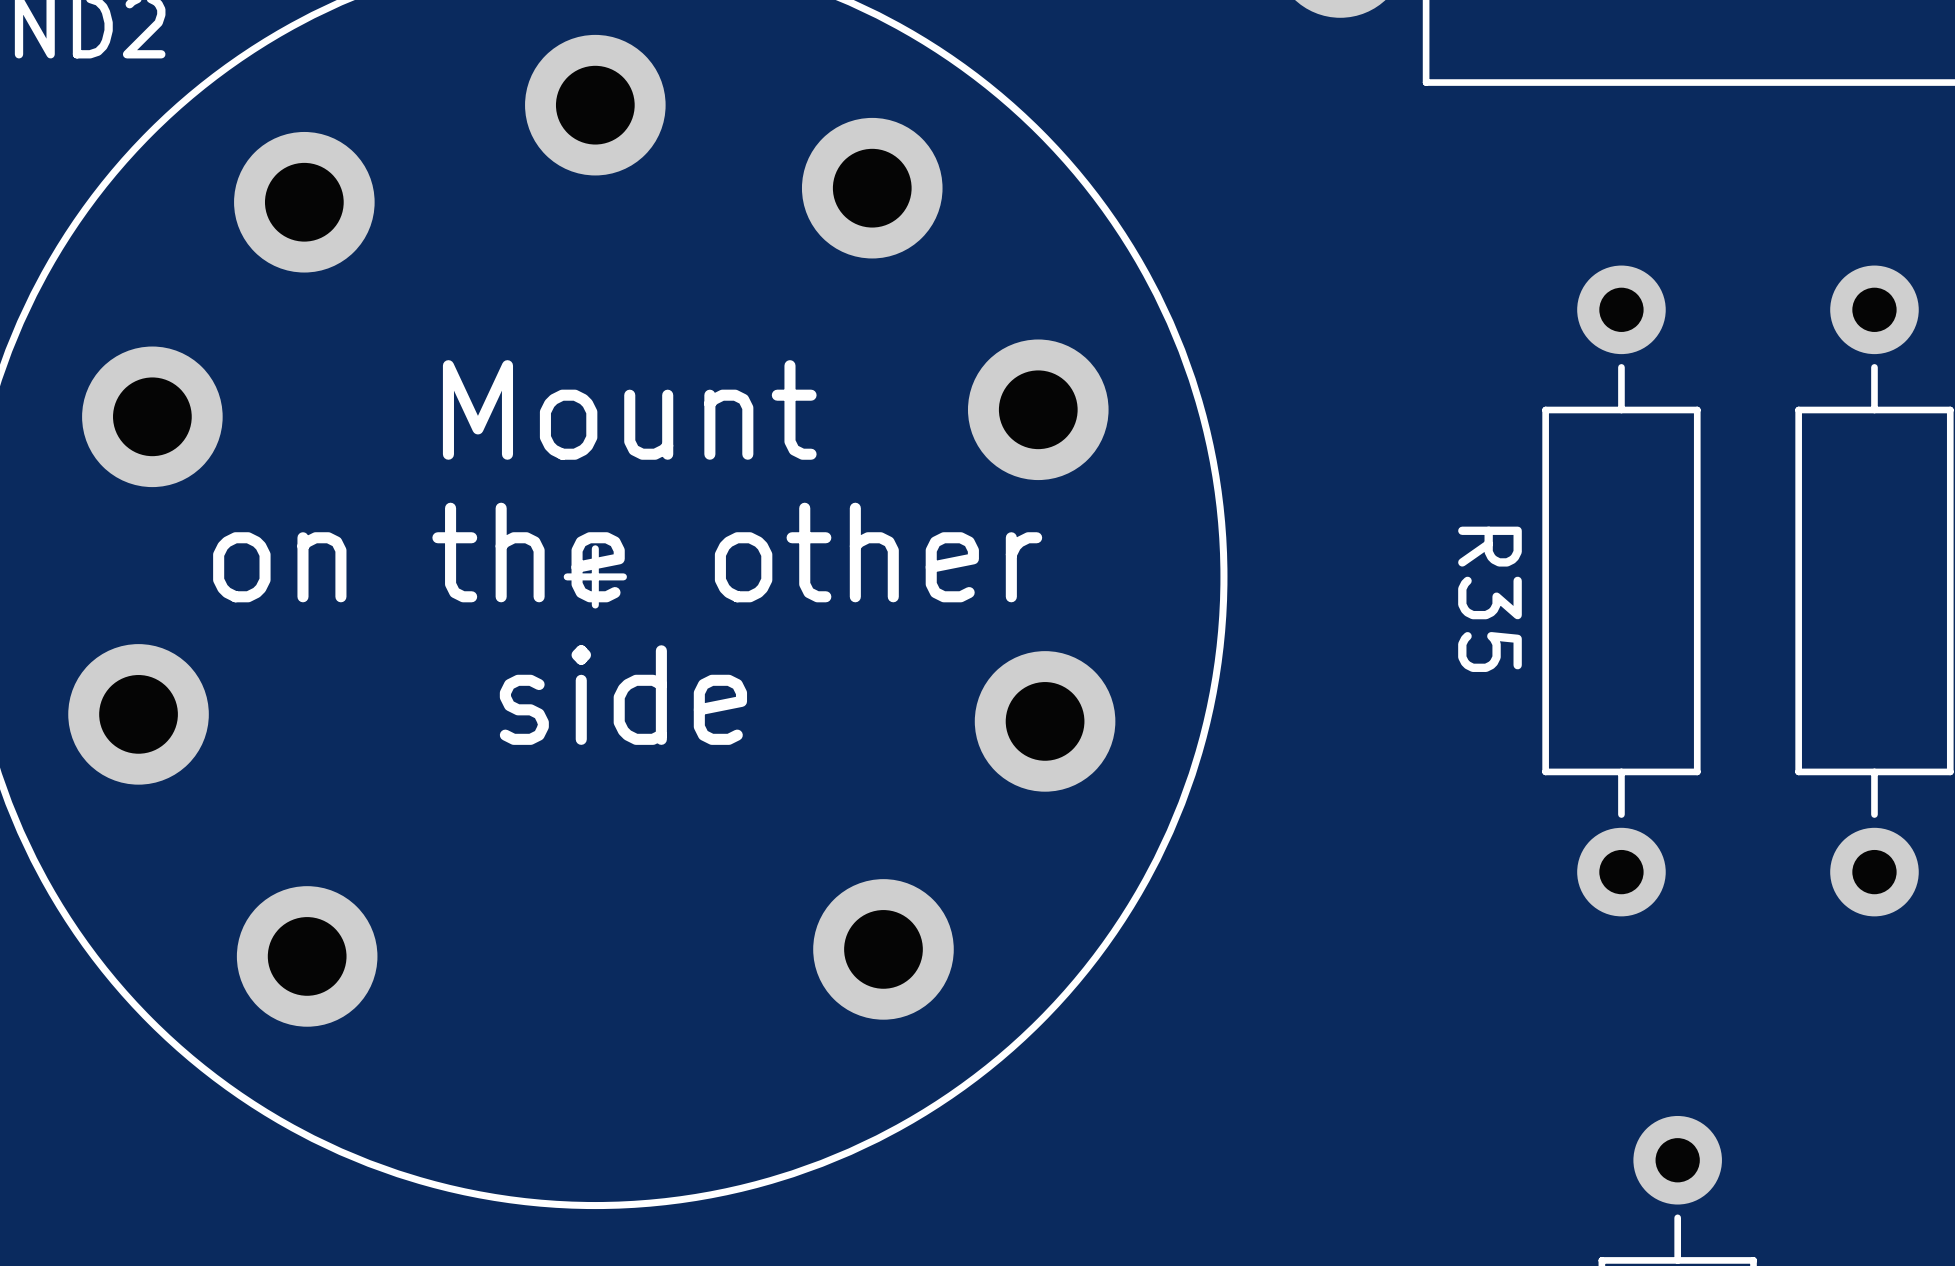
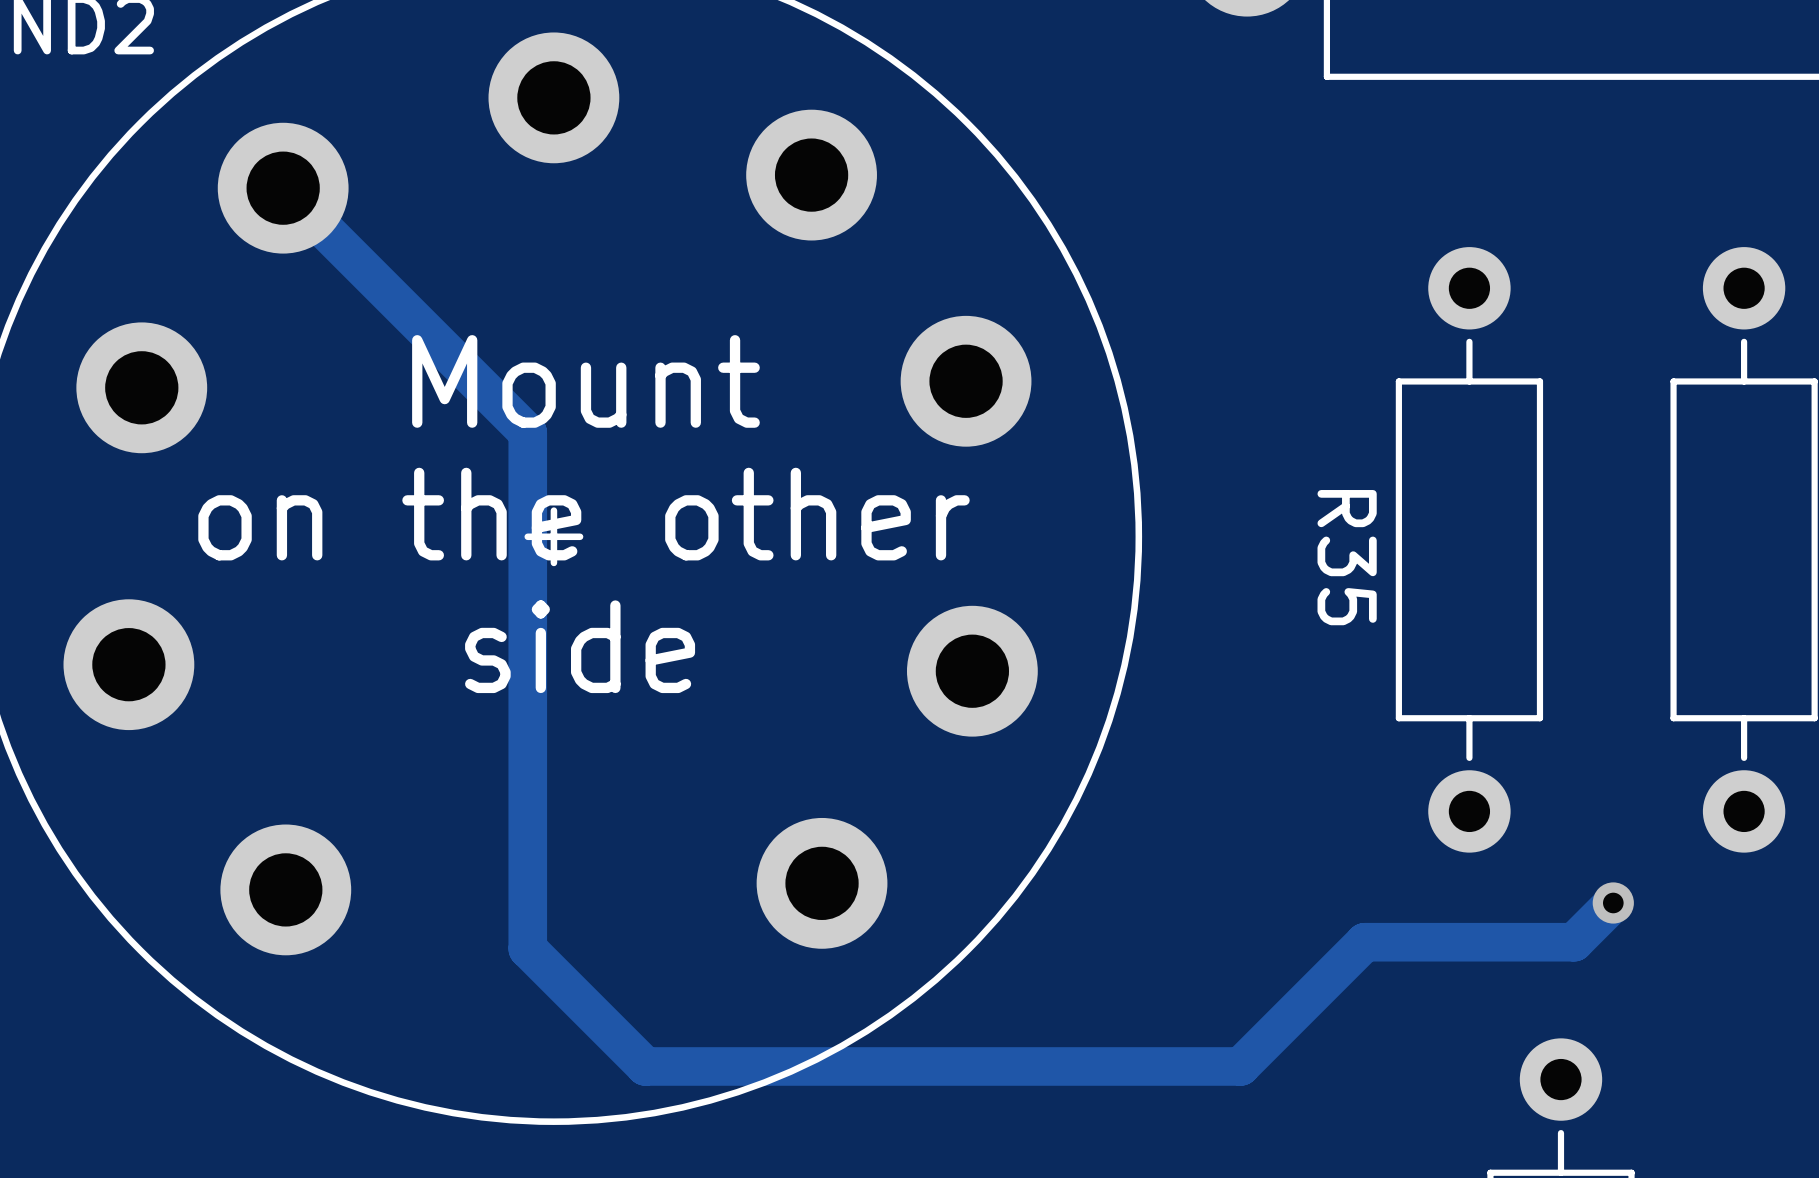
track: none -> (283, 188) (527, 432) (527, 948) (645, 1066) (1240, 1066) (1364, 942) (1574, 942) (1613, 902)
R35 position: (1621, 590) -> (1469, 549)
via: none -> (1613, 902)

